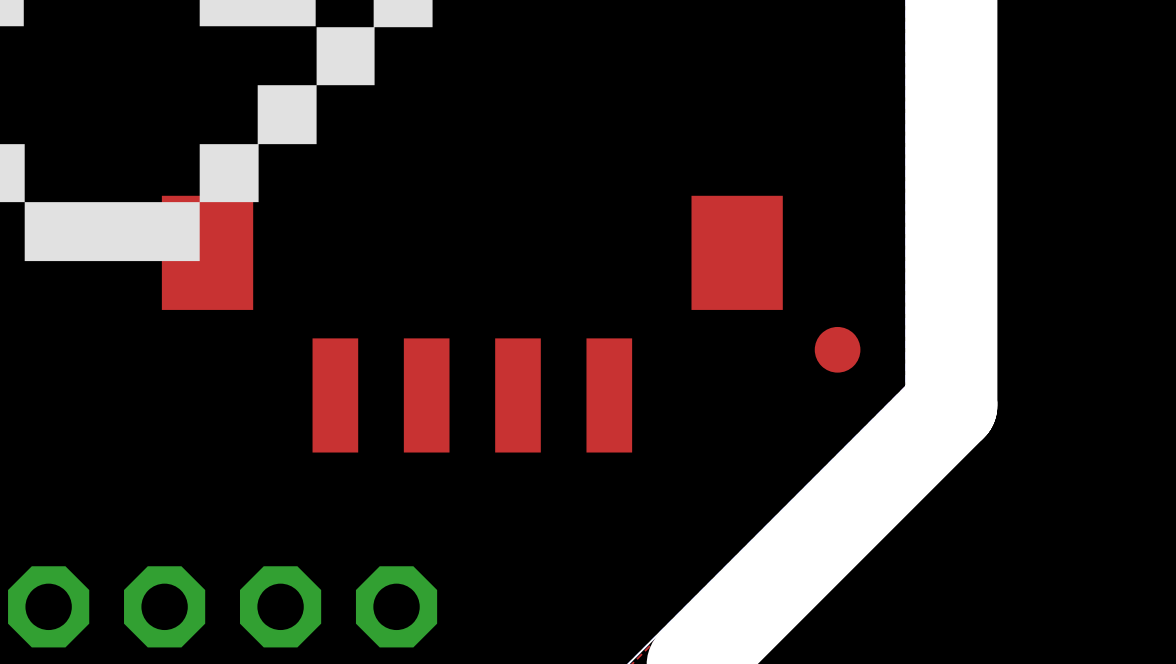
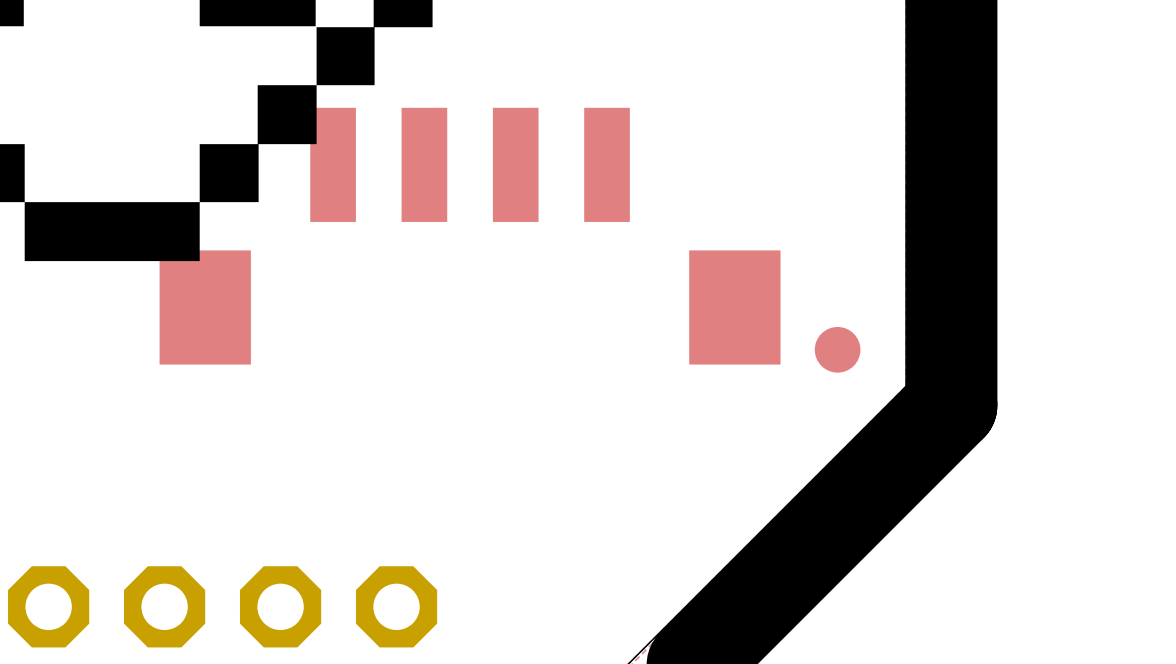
part rotation: 0° (472, 324) -> 180° (470, 236)

